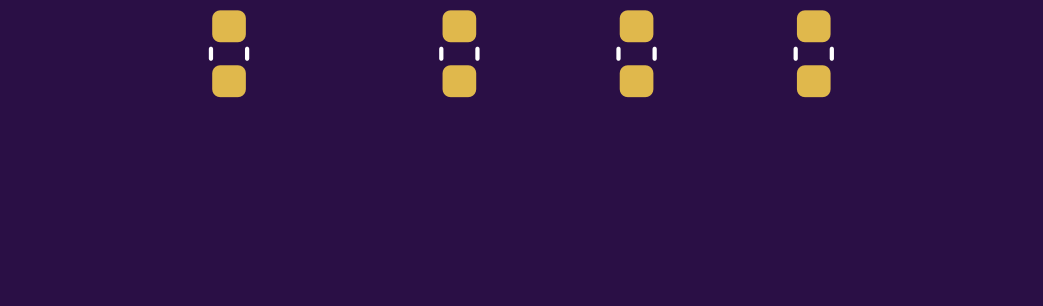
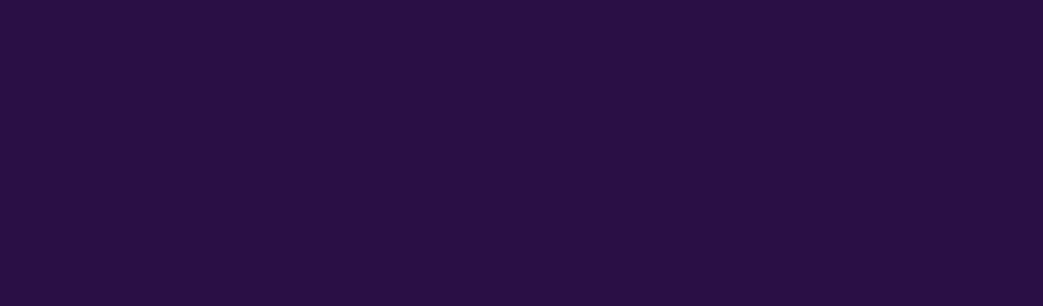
part: (229, 53) -> none
part: (459, 53) -> none
part: (636, 53) -> none
part: (813, 53) -> none

